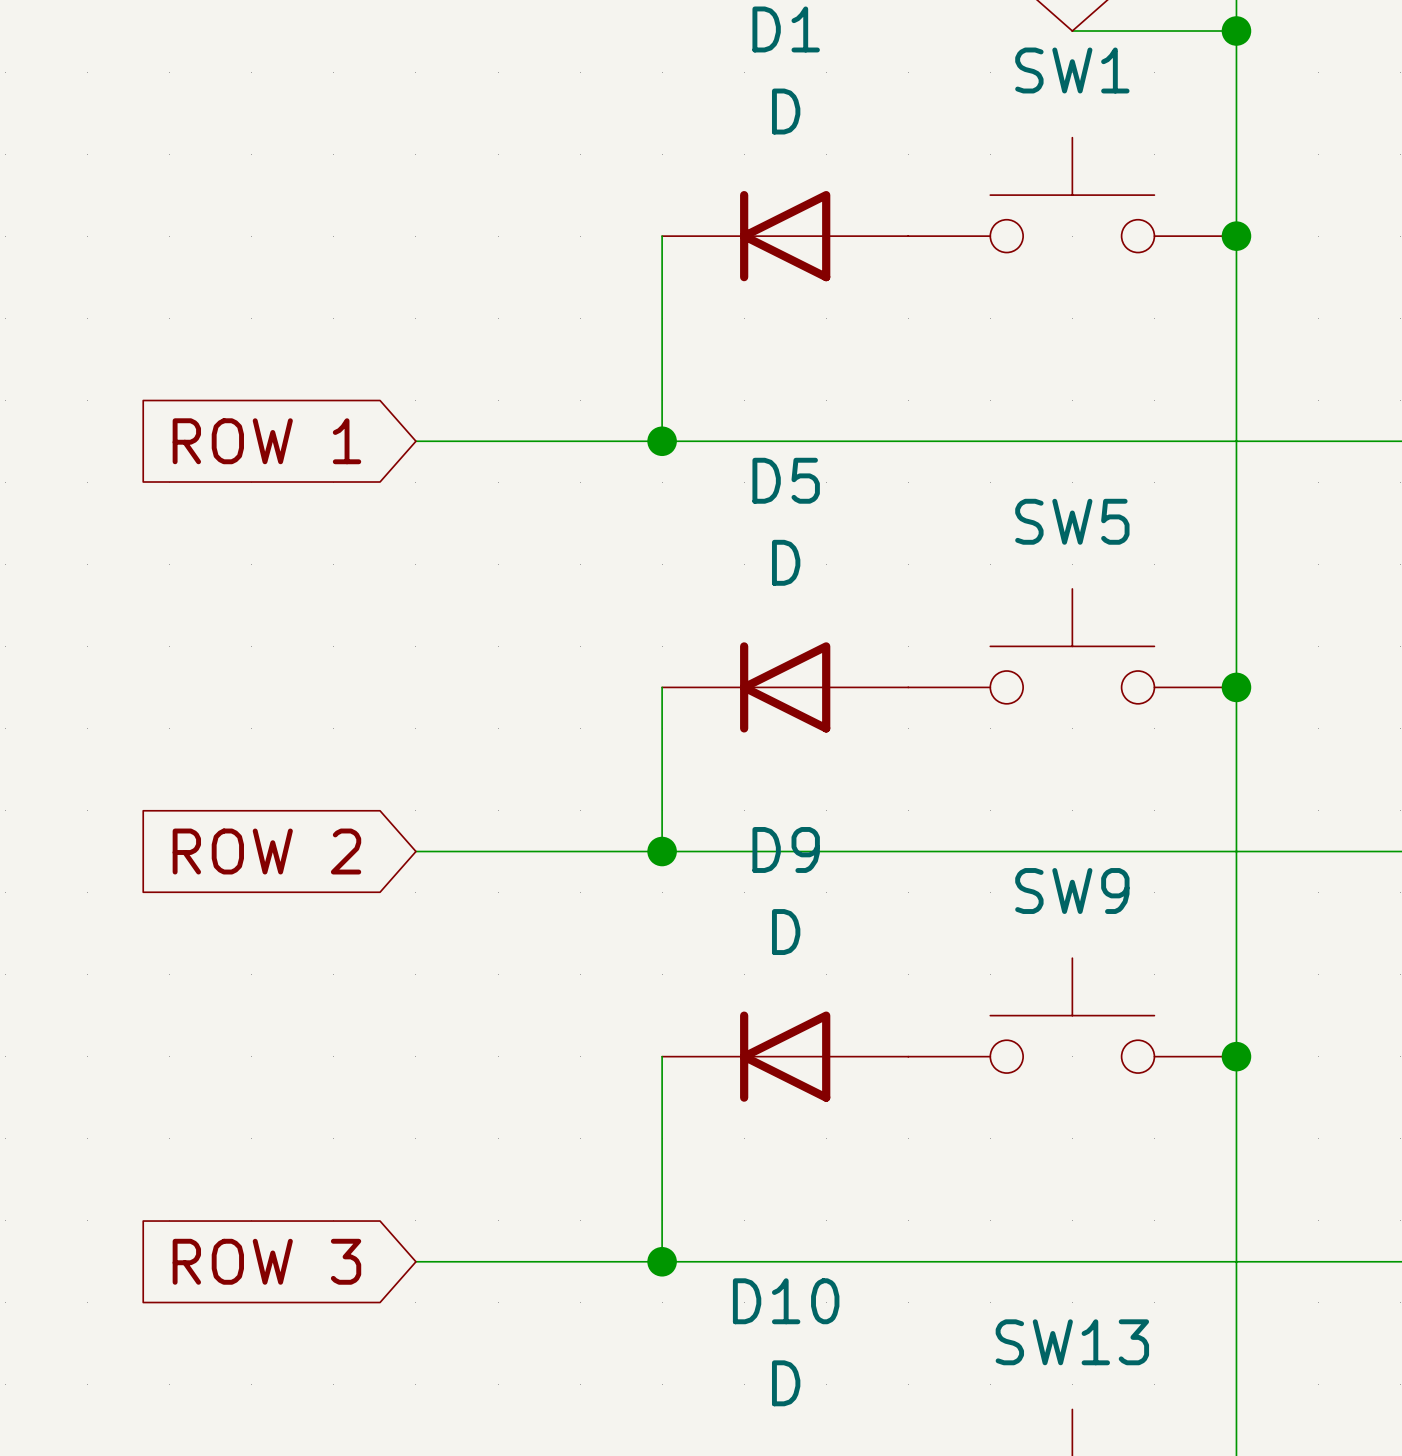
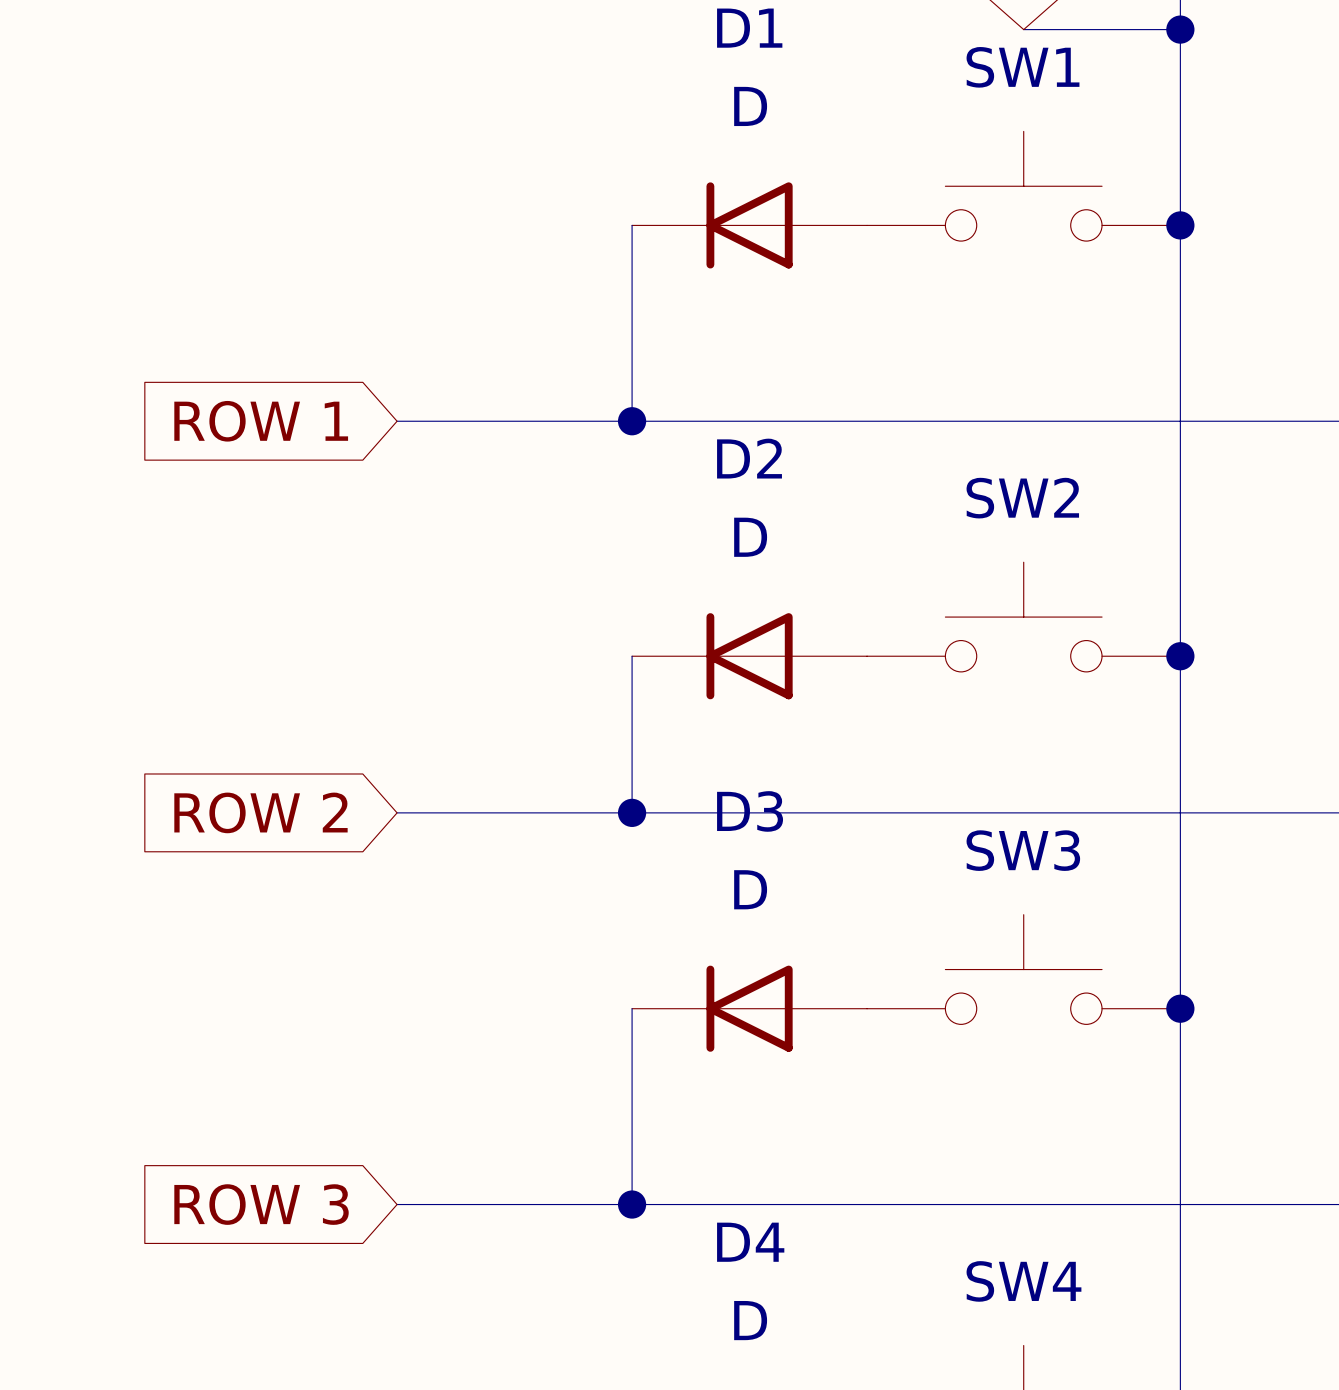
D5 name: D5 (786, 480) -> D2 (749, 458)
SW5 name: SW5 (1072, 521) -> SW2 (1022, 498)
D9 name: D9 (786, 849) -> D3 (750, 811)
SW9 name: SW9 (1072, 891) -> SW3 (1023, 850)
D10 name: D10 (786, 1301) -> D4 (750, 1242)
SW13 name: SW13 (1072, 1342) -> SW4 (1023, 1281)

